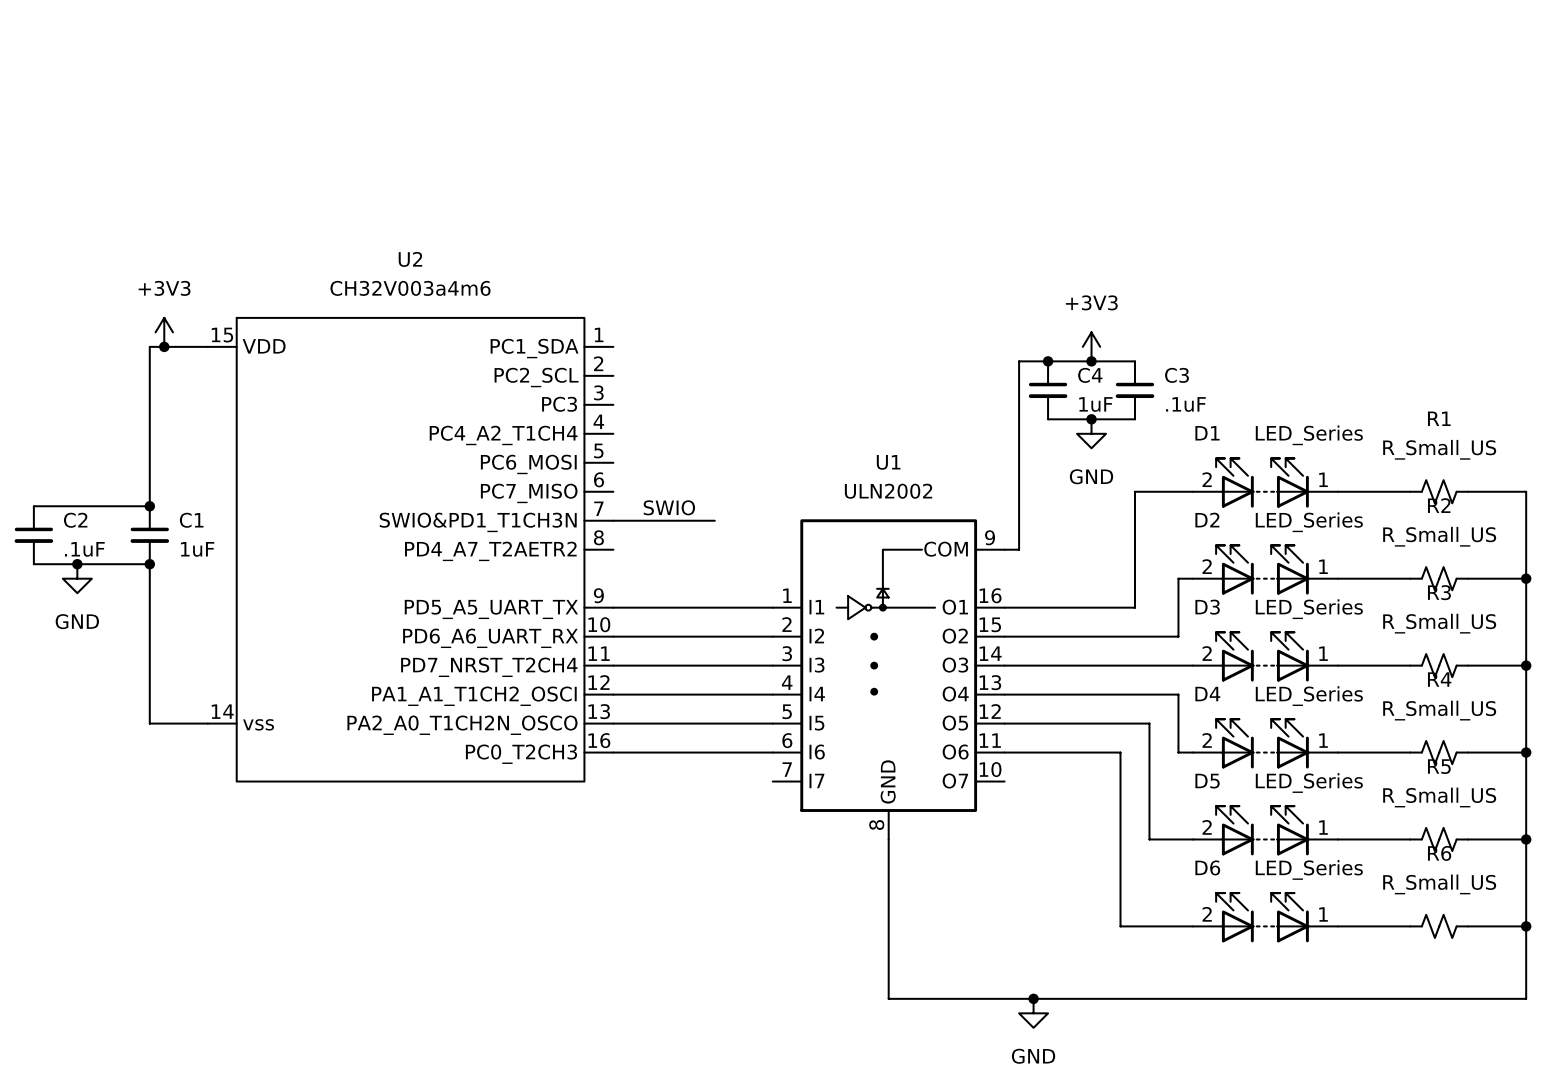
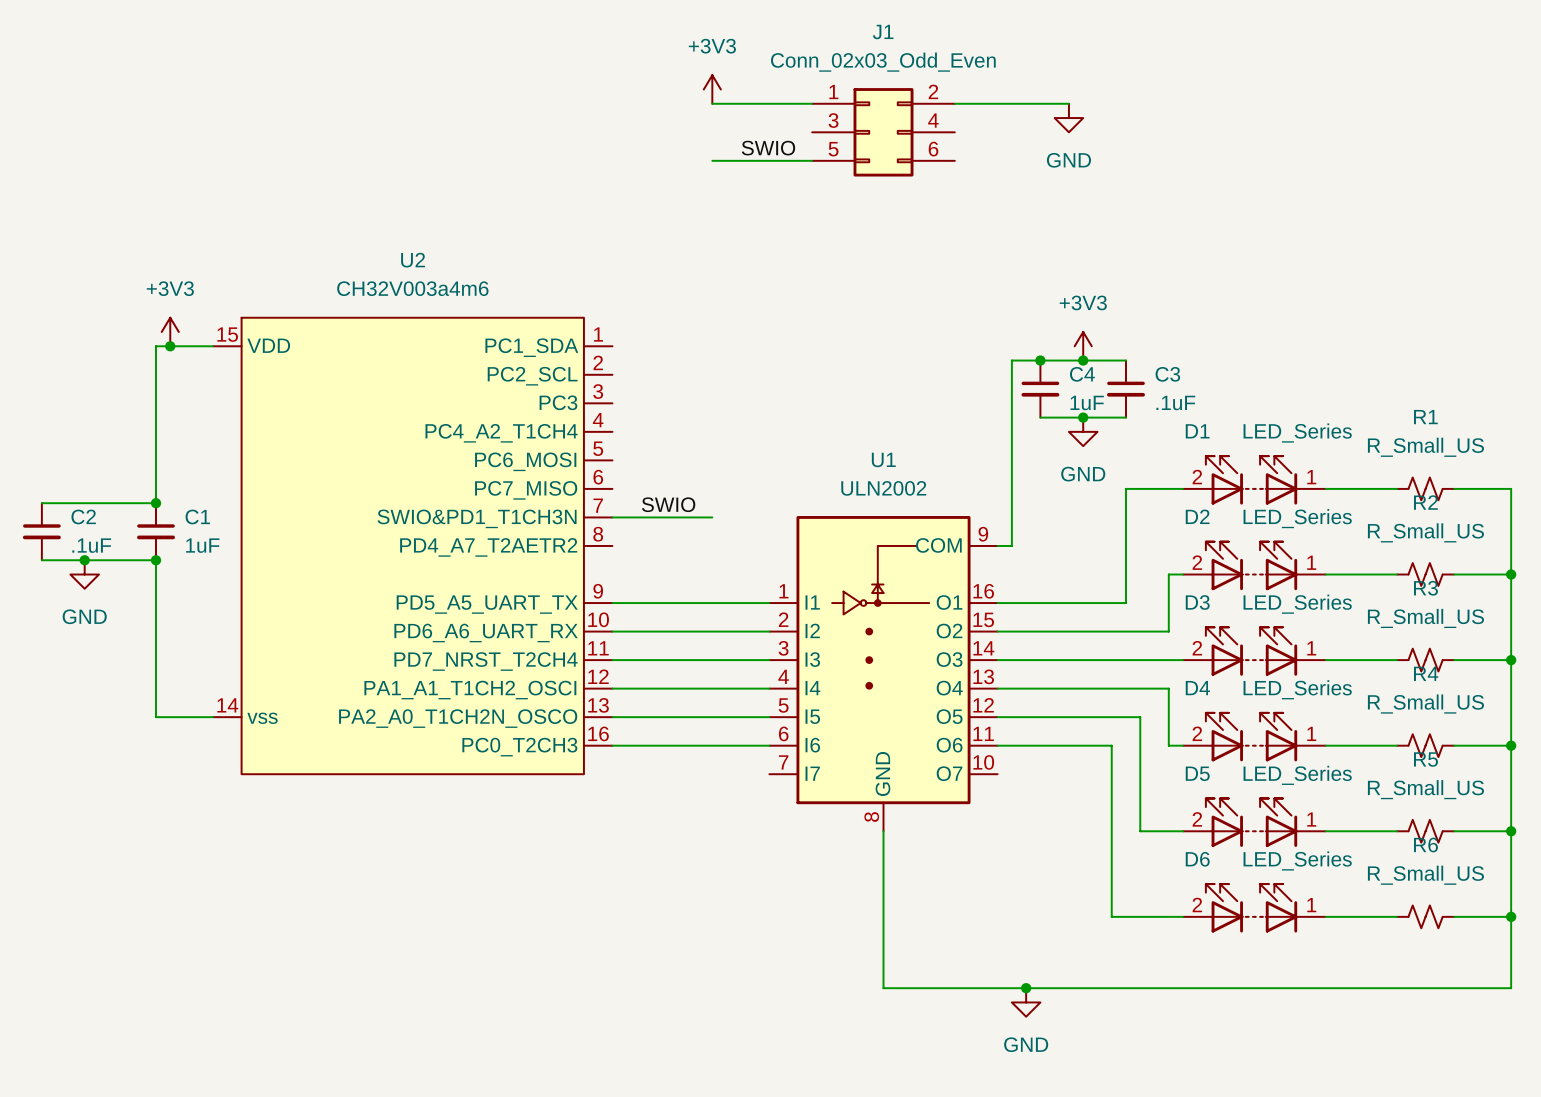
power symbol: none -> +3V3 (712, 89)
wire: none -> (712, 103) (812, 103)
wire: none -> (954, 103) (1068, 103)
power symbol: none -> GND (1068, 118)
J1: none -> Conn_02x03_Odd_Even (883, 132)
label: none -> SWIO (768, 148)
wire: none -> (712, 160) (812, 160)

